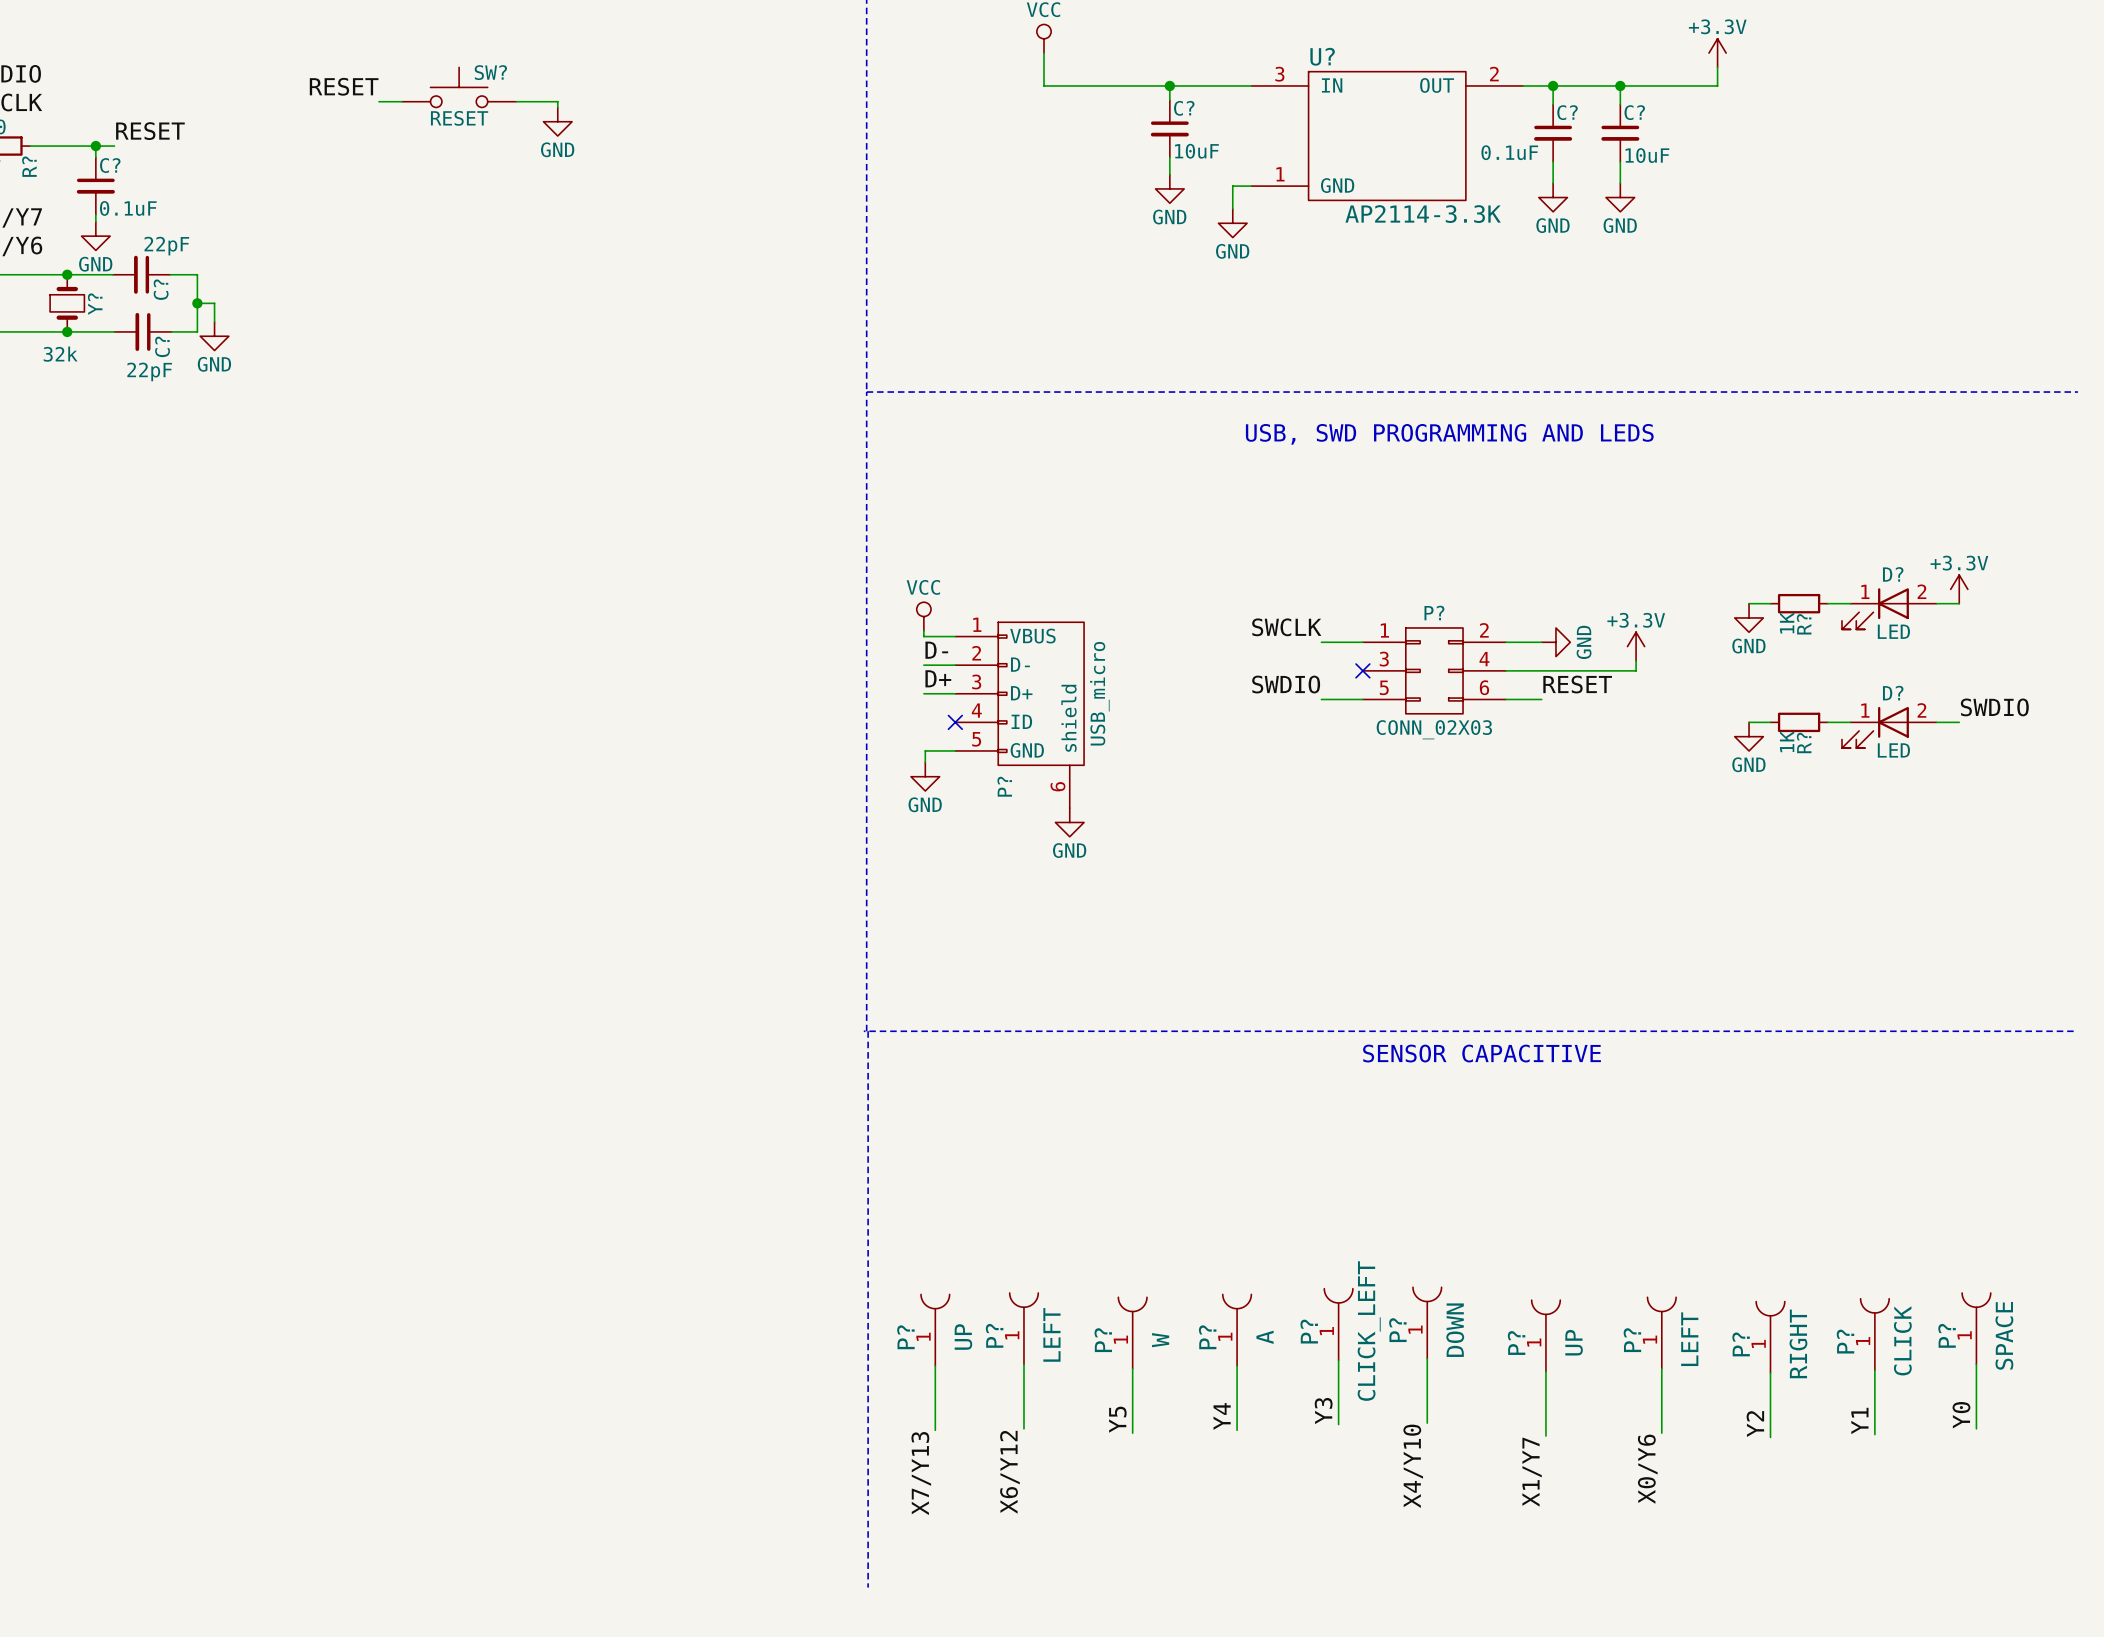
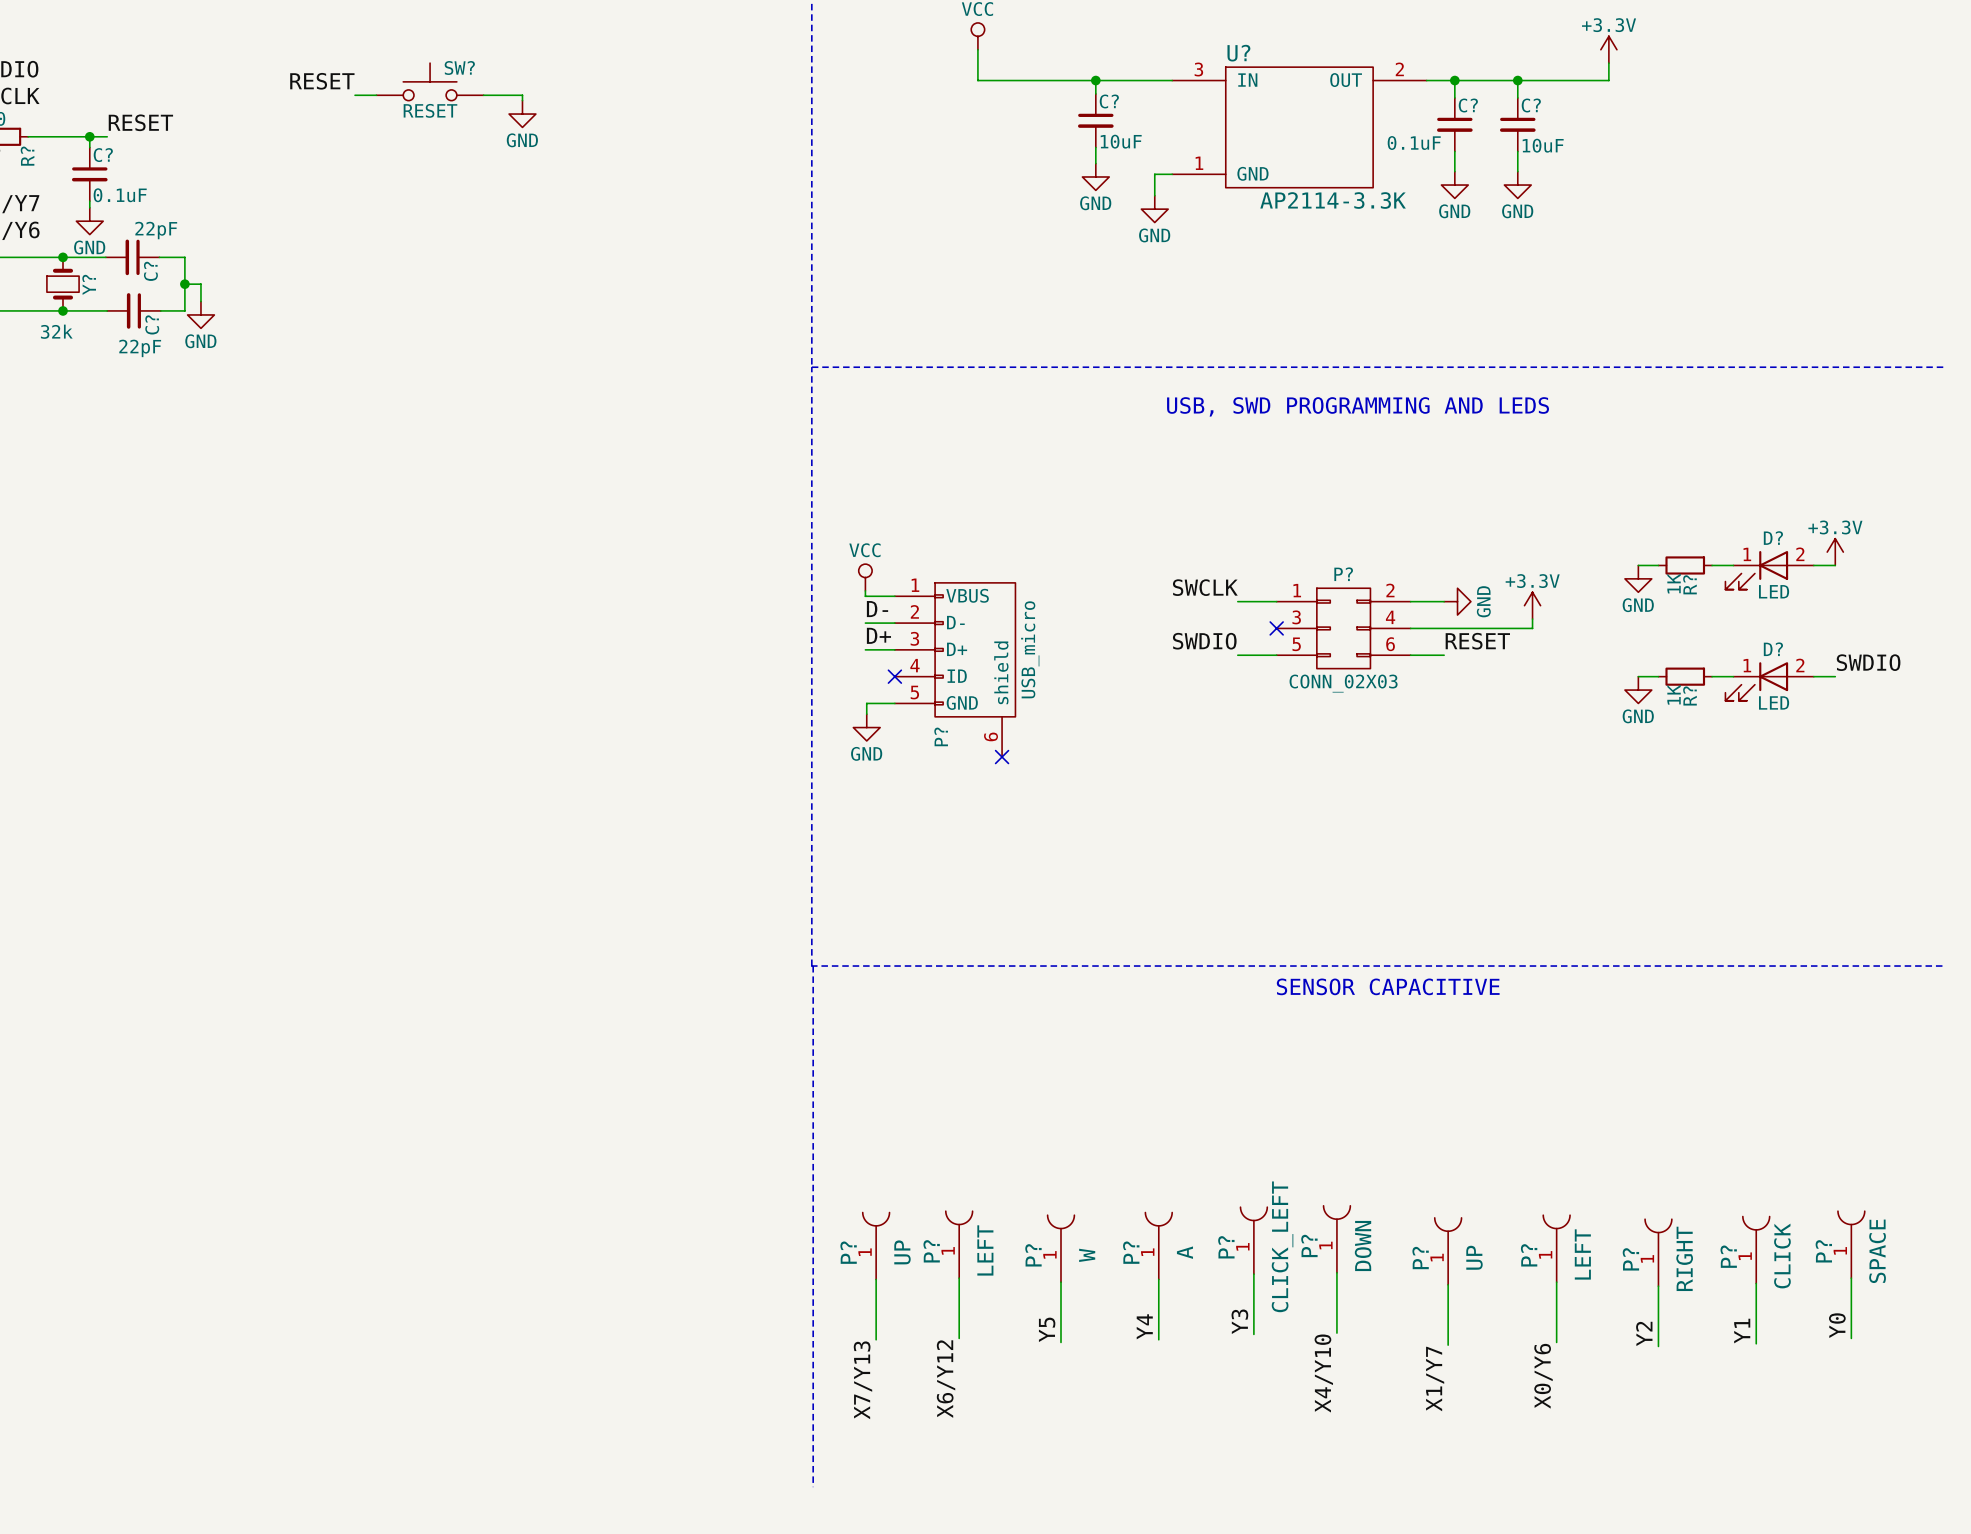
no-connect mark: none -> (1002, 757)
power symbol: GND (1069, 822) -> none

